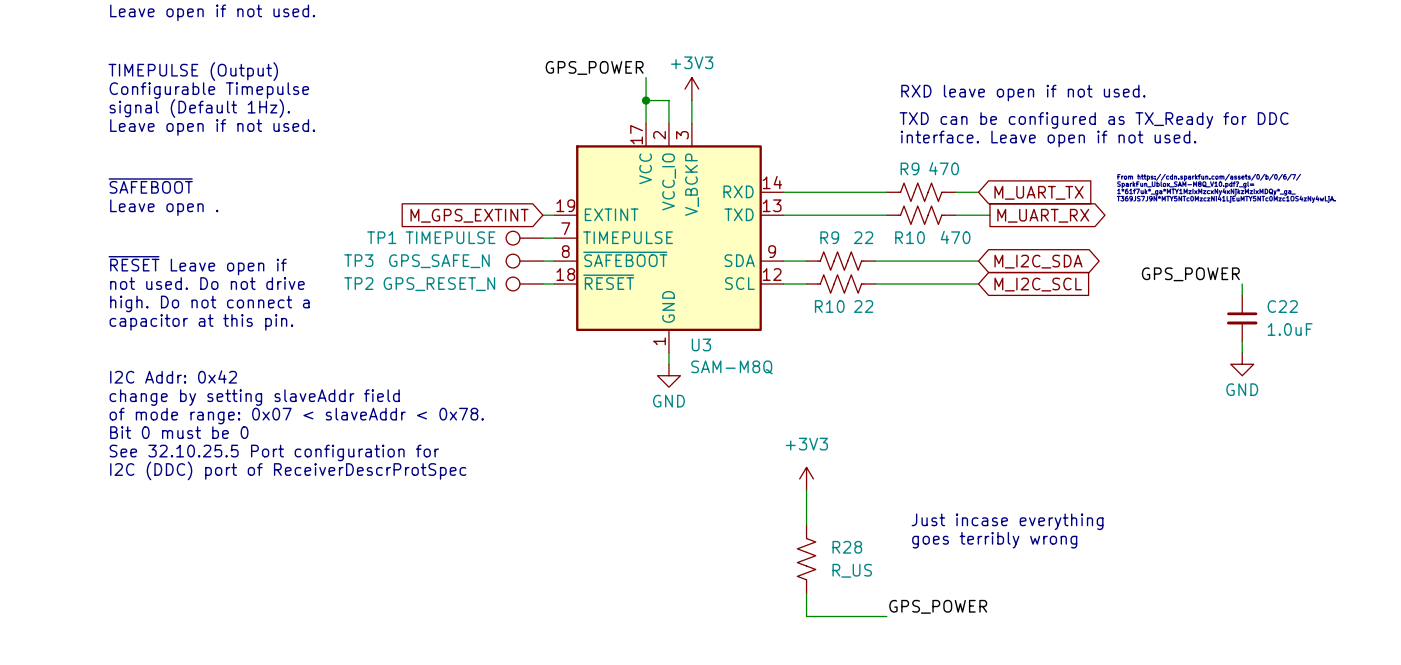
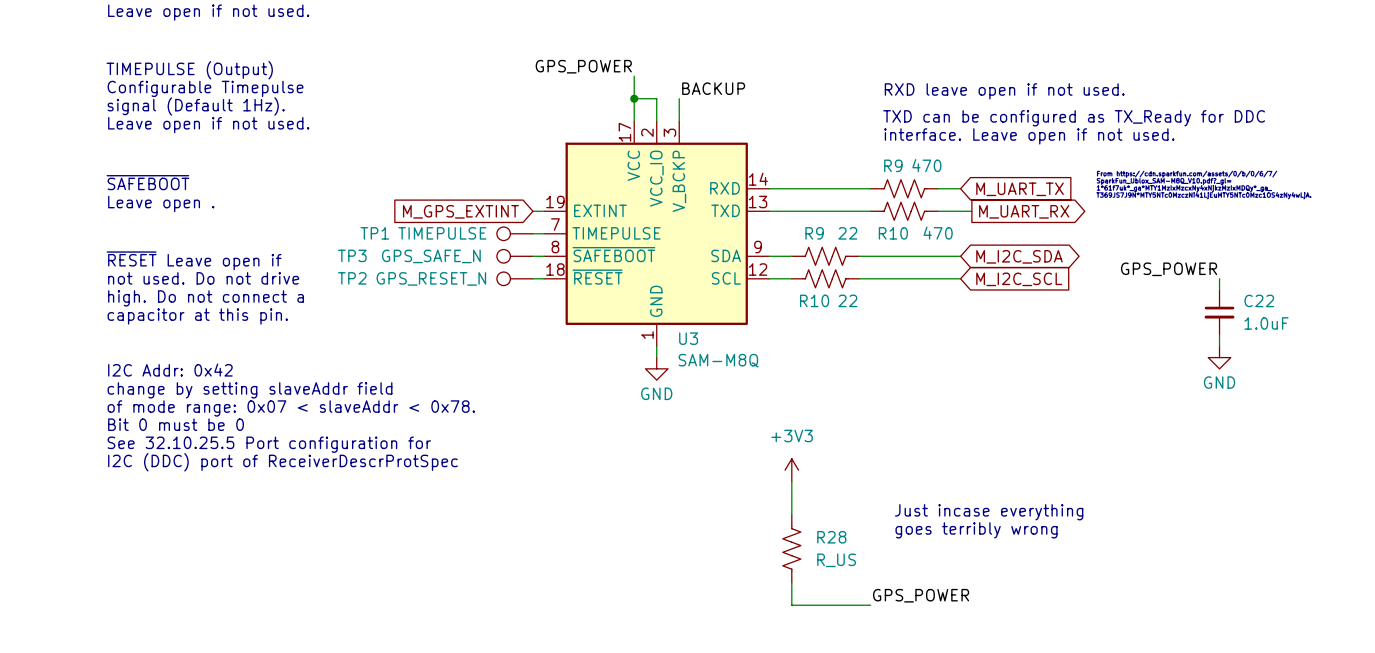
power symbol: +3V3 (691, 89) -> none
label: none -> BACKUP (713, 88)

